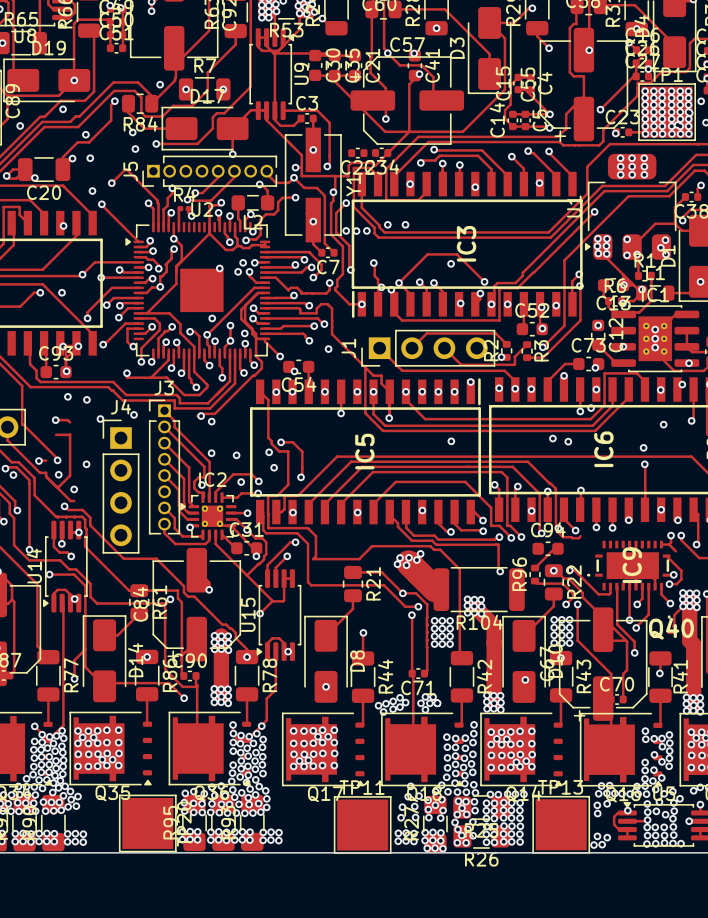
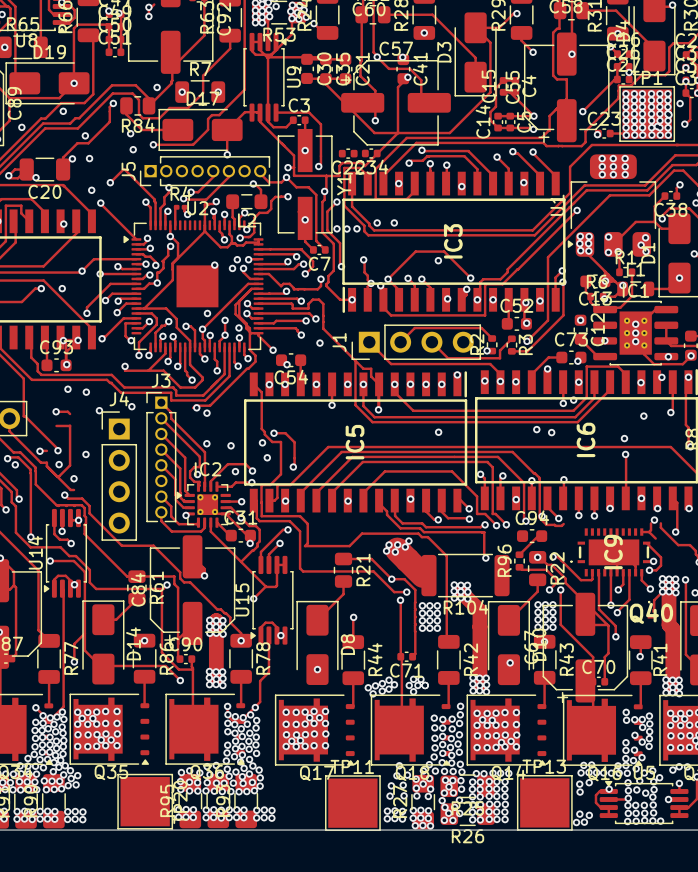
via: none -> (654, 520)
via: (671, 535) -> none
via: (681, 535) -> none

